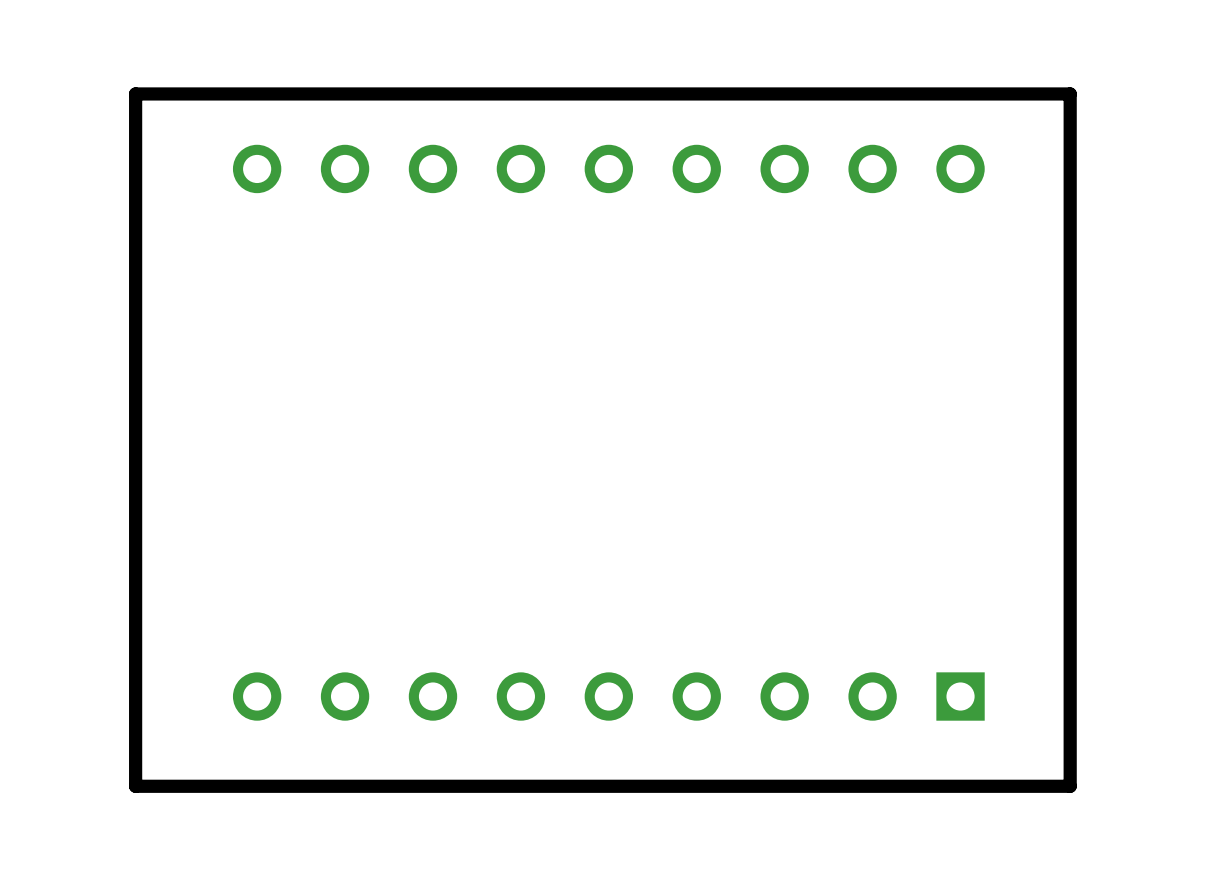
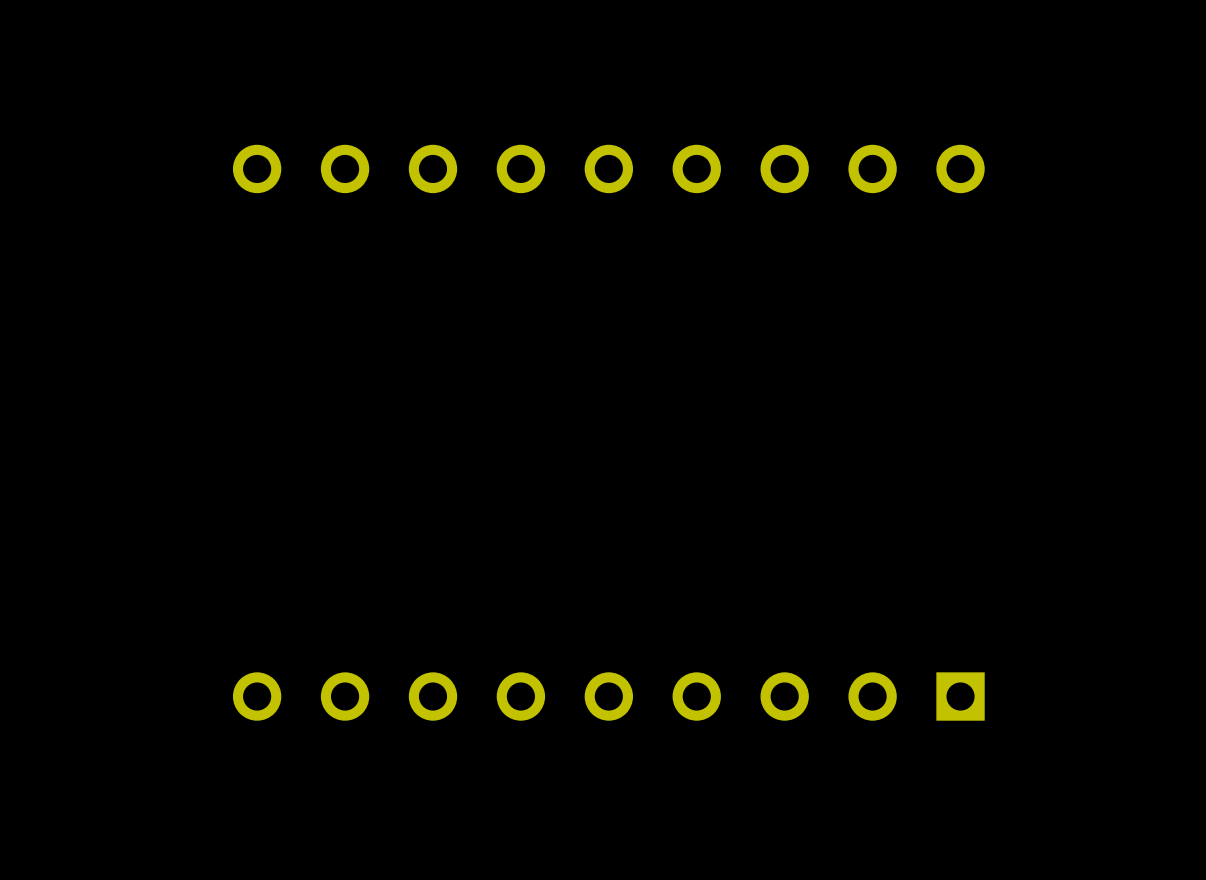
board edge: (1070, 93) (135, 93) (135, 786) (1070, 786) (1070, 93) -> none

